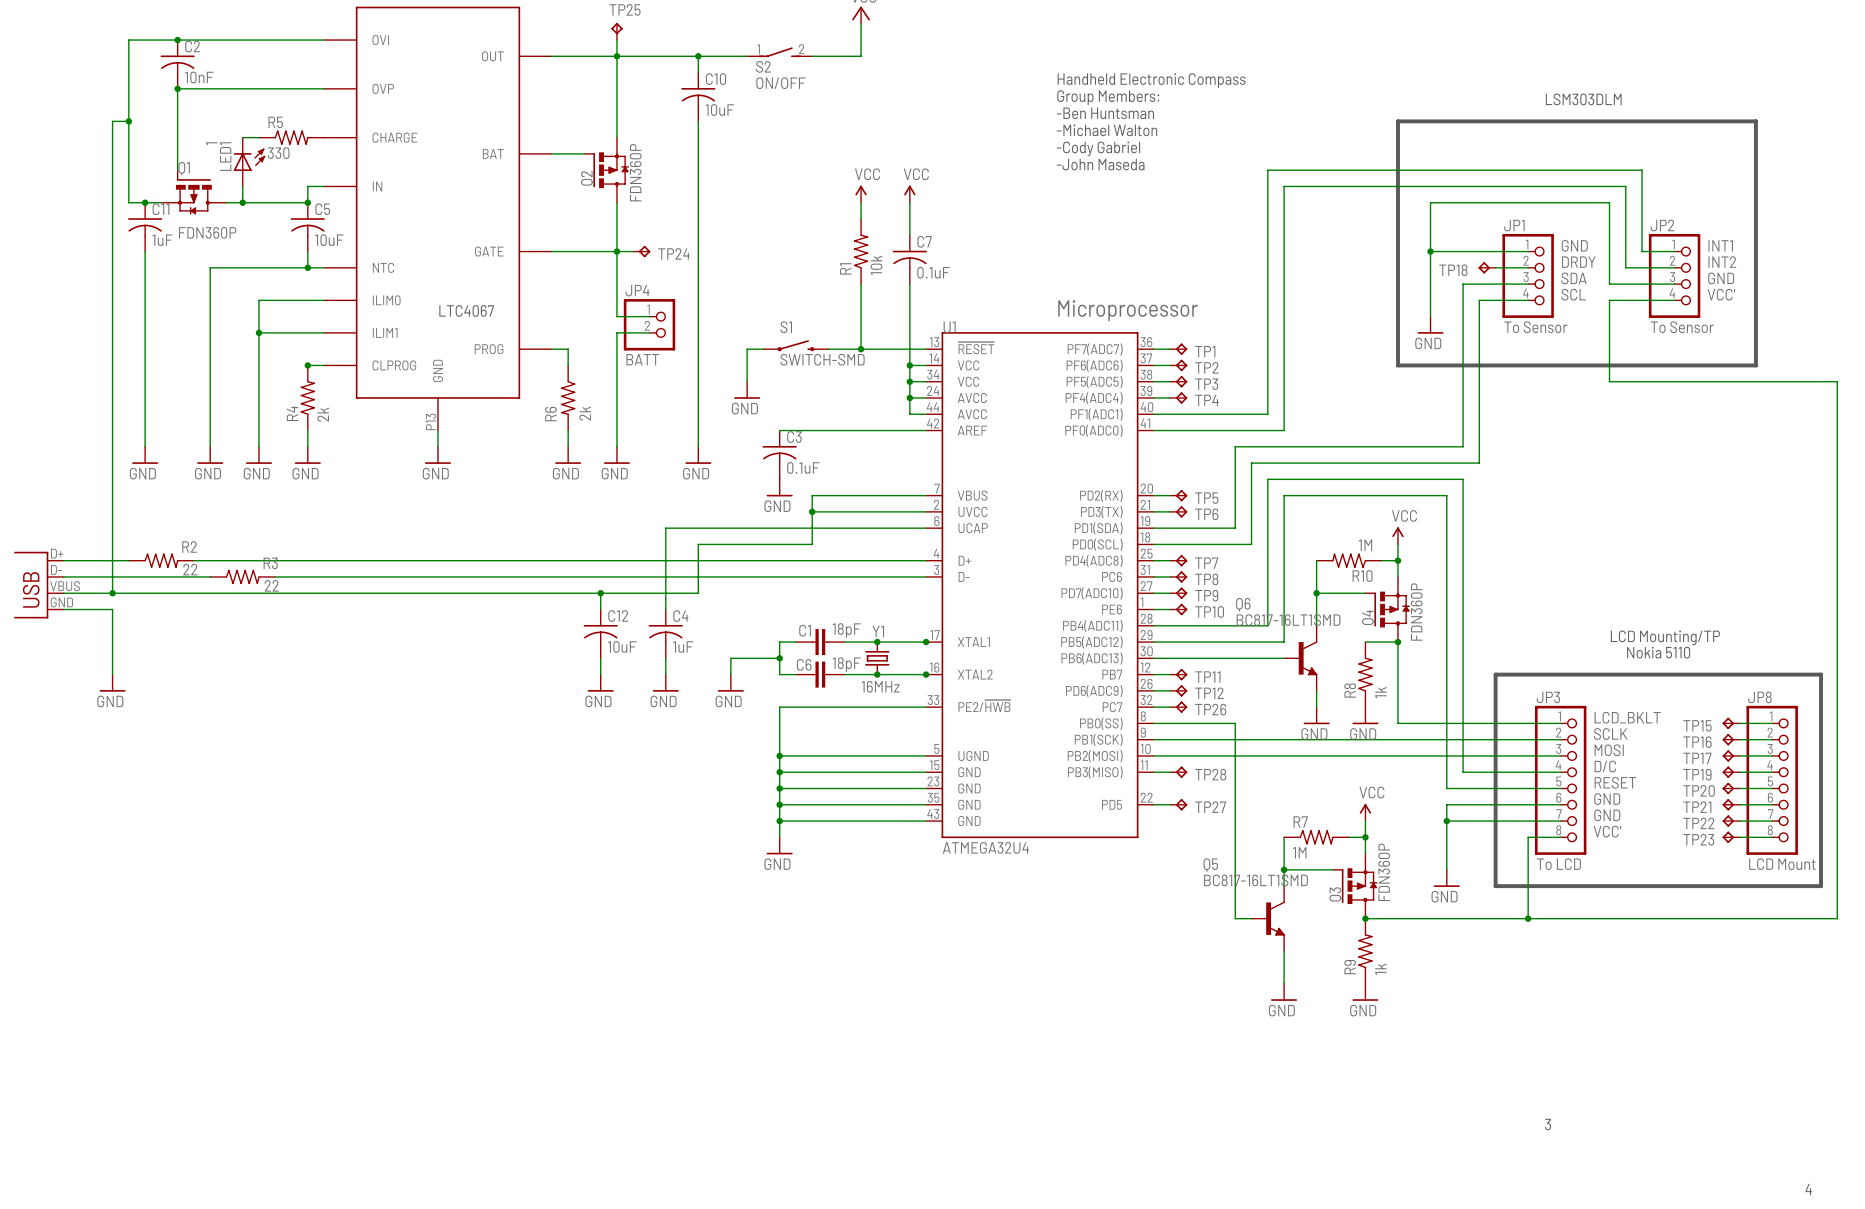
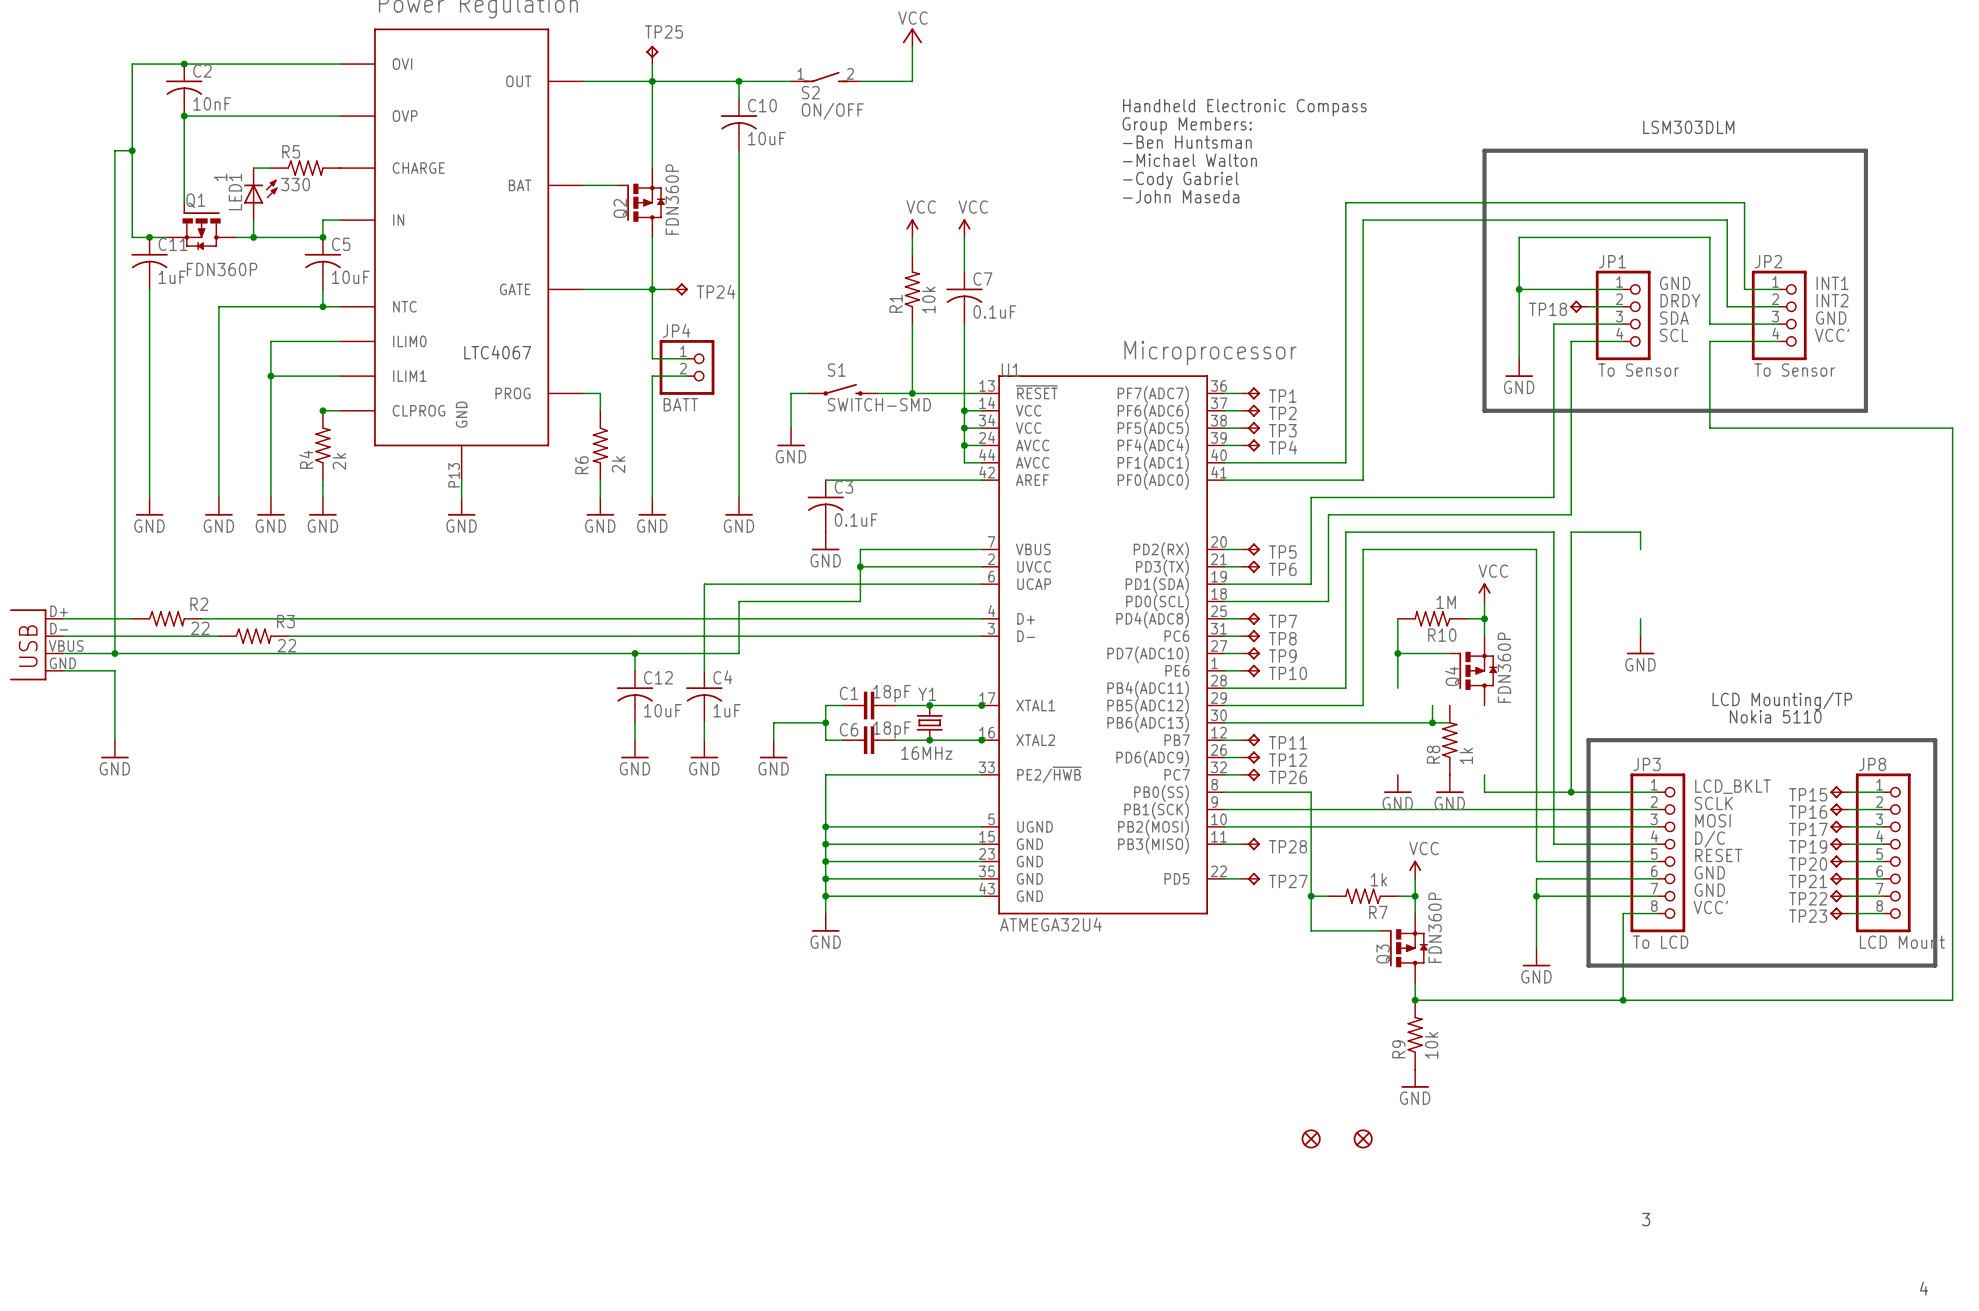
wire: none -> (1640, 549) (1640, 532) (1571, 532) (1571, 792)
wire: none -> (1640, 618) (1640, 636)
power symbol: none -> GND (1640, 645)
wire: (1365, 642) (1397, 642) (1397, 707) -> none
junction: (1397, 642) -> none
wire: none -> (1363, 722) (1449, 722)
Q6: BC817-16LT1SMD (1300, 658) -> none
junction: none -> (1432, 722)
wire: (1316, 690) (1316, 707) -> (1432, 705) (1432, 722)
junction: none -> (1571, 792)
power symbol position: VCC (1365, 812) -> VCC (1415, 869)
wire: none -> (1311, 896) (1328, 896)
junction: none -> (1311, 896)
junction: none -> (1415, 896)
wire: (1365, 821) (1365, 853) -> (1415, 878) (1415, 913)
wire: (1284, 837) (1284, 886) -> none
R7 rotation: 0° (1316, 837) -> 180° (1363, 896)
wire: (1349, 837) (1365, 837) -> (1397, 896) (1415, 896)
junction: (1365, 837) -> none
R7 value: 1M (1299, 852) -> 1k (1378, 879)
wire: (1235, 853) (1235, 918) (1251, 918) -> (1311, 930) (1380, 930)
wire: (1284, 869) (1332, 869) -> none
junction: (1284, 869) -> none
Q3 position: (1354, 886) -> (1403, 948)
wire: none -> (1415, 982) (1415, 1000) (1449, 1000)
Q5: BC817-16LT1SMD (1268, 918) -> none
junction position: (1365, 918) -> (1415, 1000)
wire: (1284, 951) (1284, 983) -> none
R9 position: (1365, 951) -> (1415, 1034)
R9 value: 1k (1380, 969) -> 10k (1431, 1045)
power symbol: GND (1284, 992) -> none
power symbol: none -> GND (1415, 1078)
power symbol: GND (1365, 992) -> none
part: none -> (1311, 1138)
part: none -> (1363, 1138)

